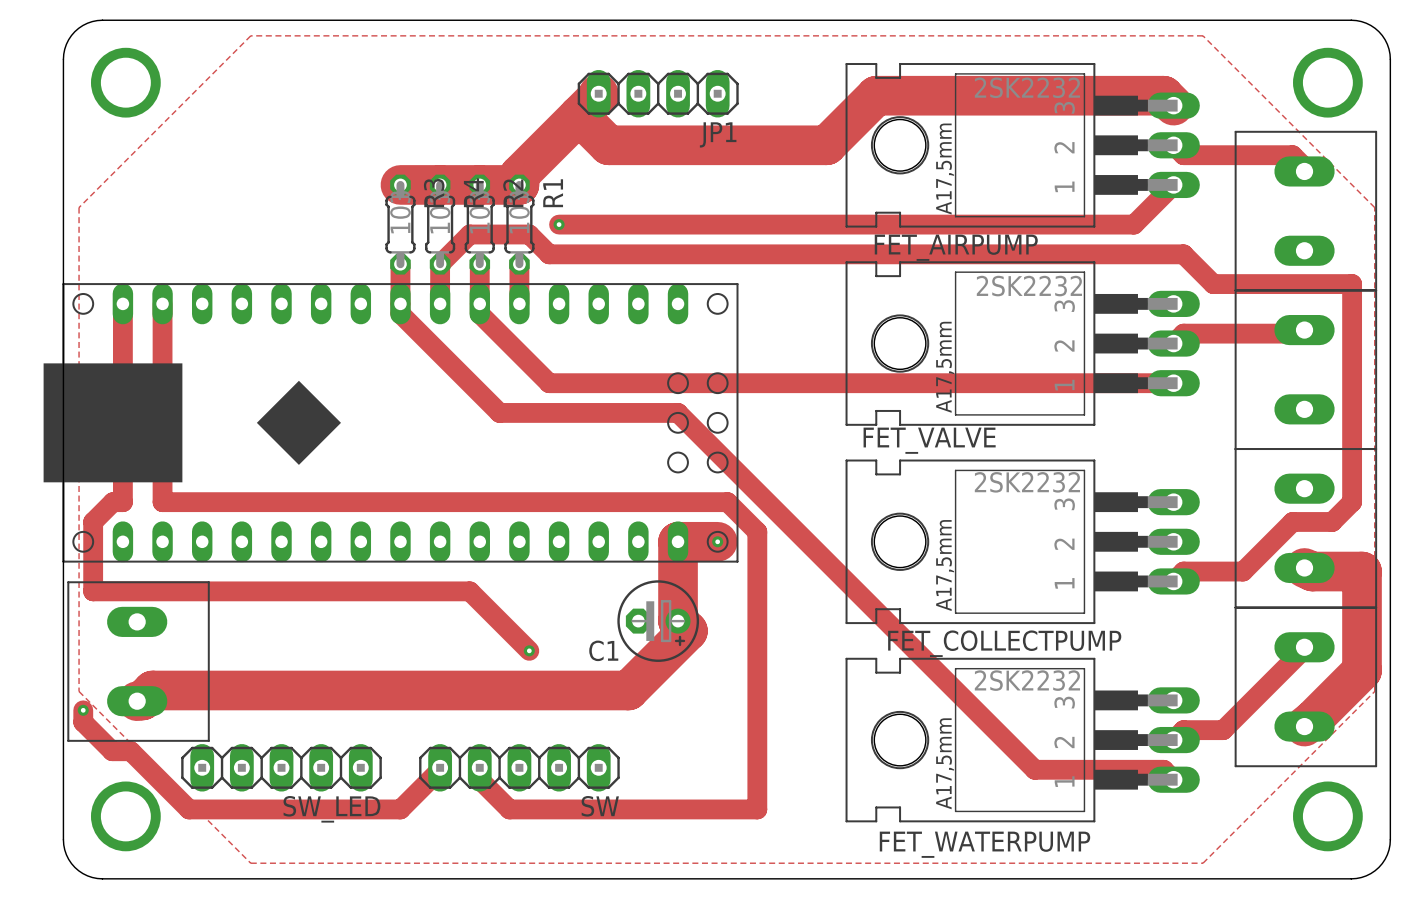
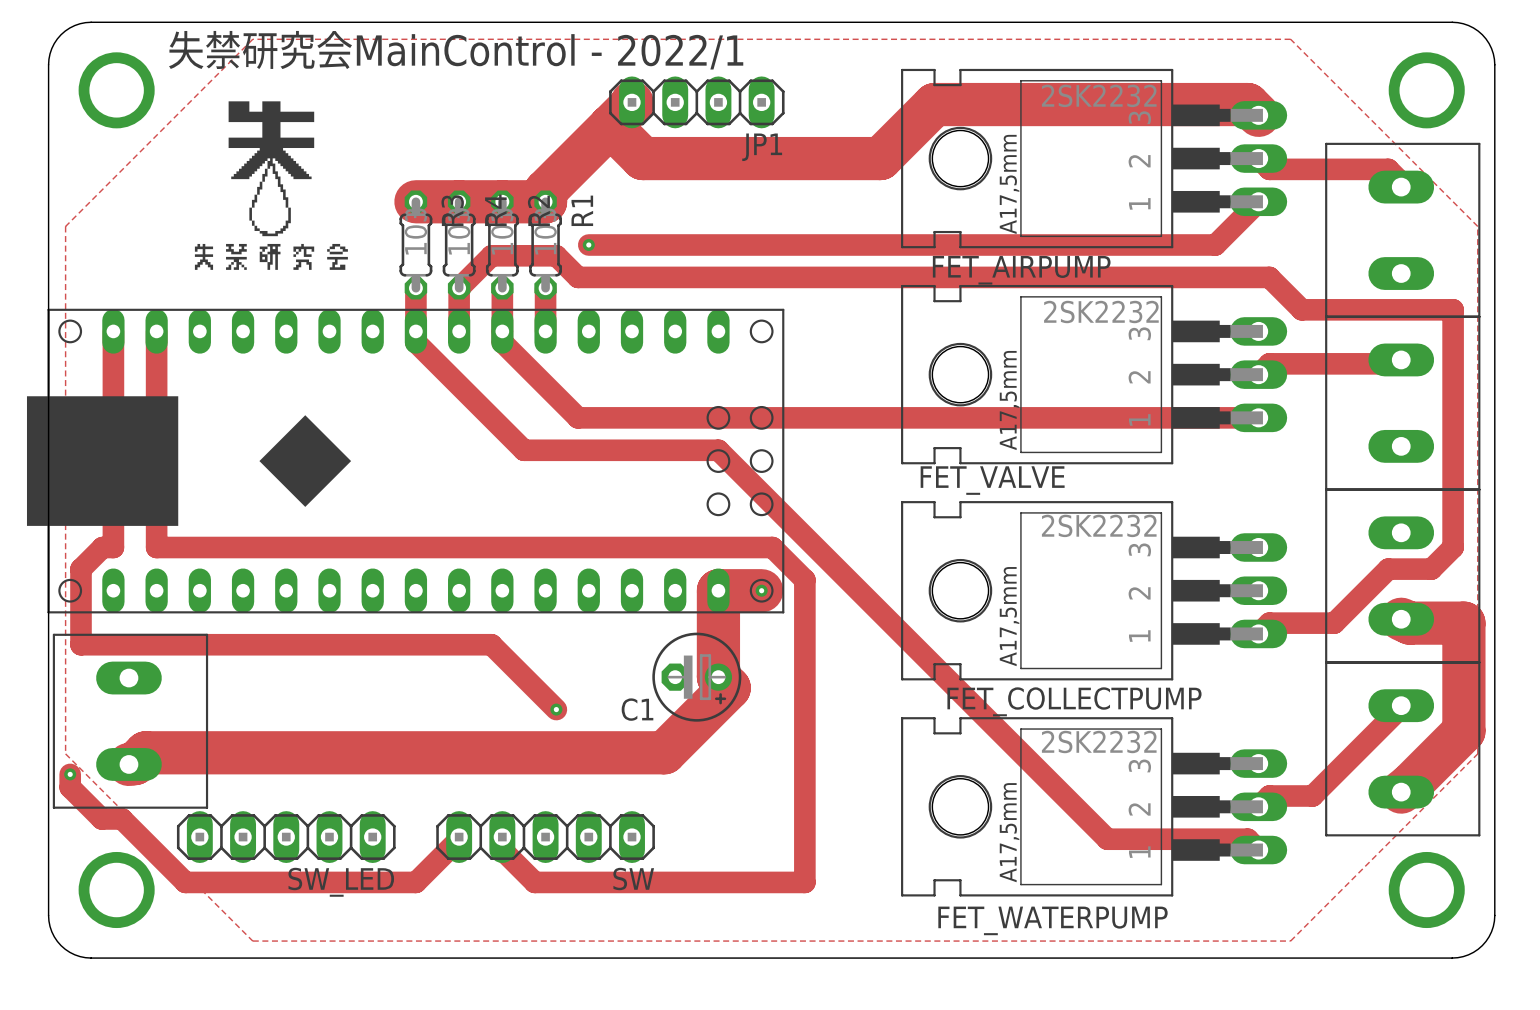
text: none -> 失禁研究会MainControl - 2022/1 (456, 50)
drawing: none -> [194, 101, 348, 270]

